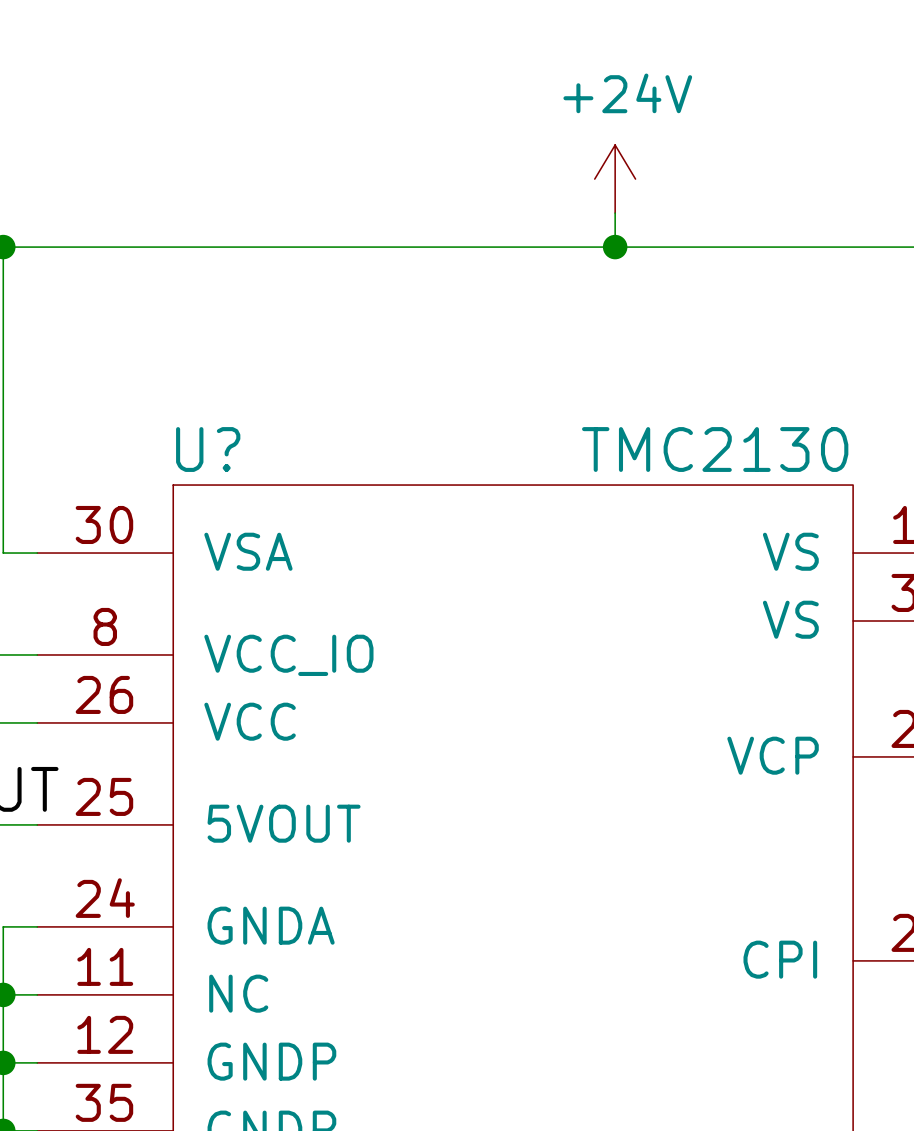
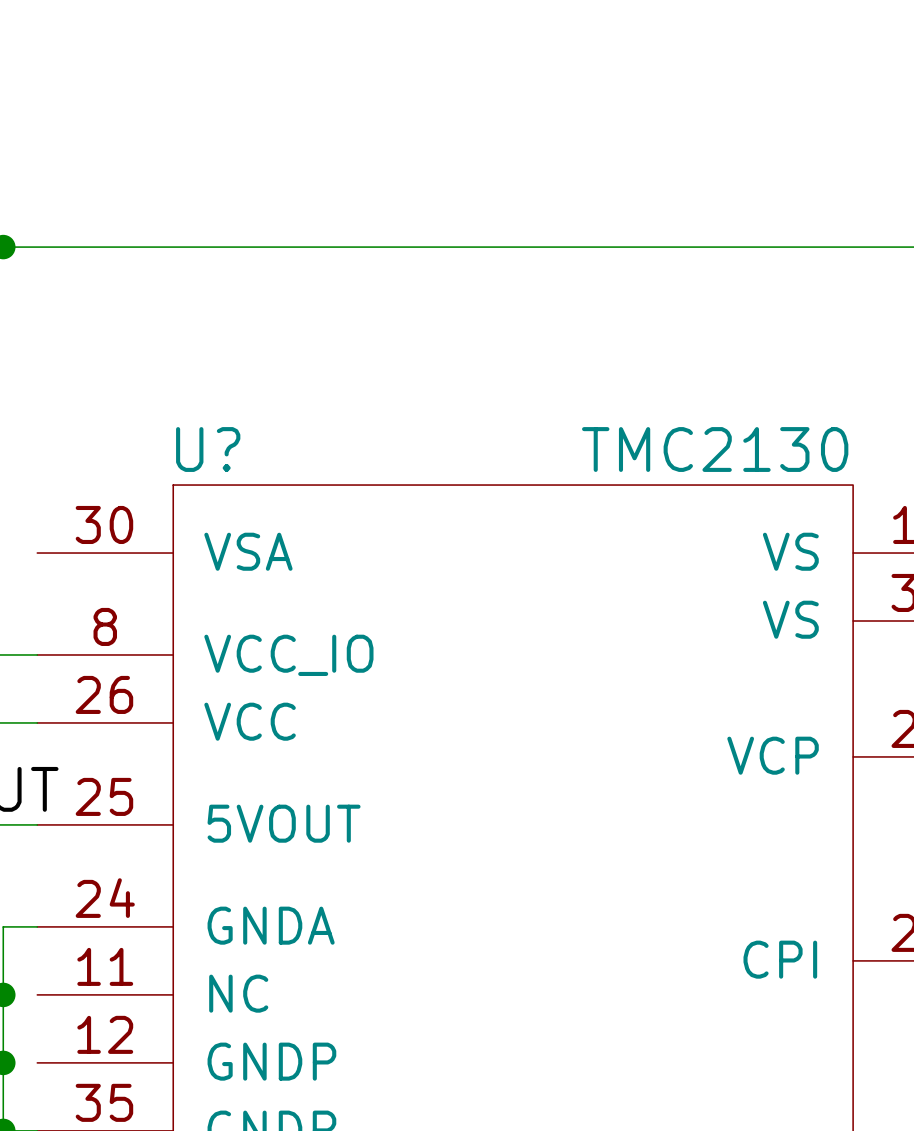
power symbol: +24V (615, 179) -> none
wire: (615, 213) (615, 247) -> none
wire: (3, 247) (3, 553) (37, 553) -> none
junction: (615, 247) -> none
wire: (3, 994) (37, 994) -> none
wire: (3, 1062) (37, 1062) -> none

